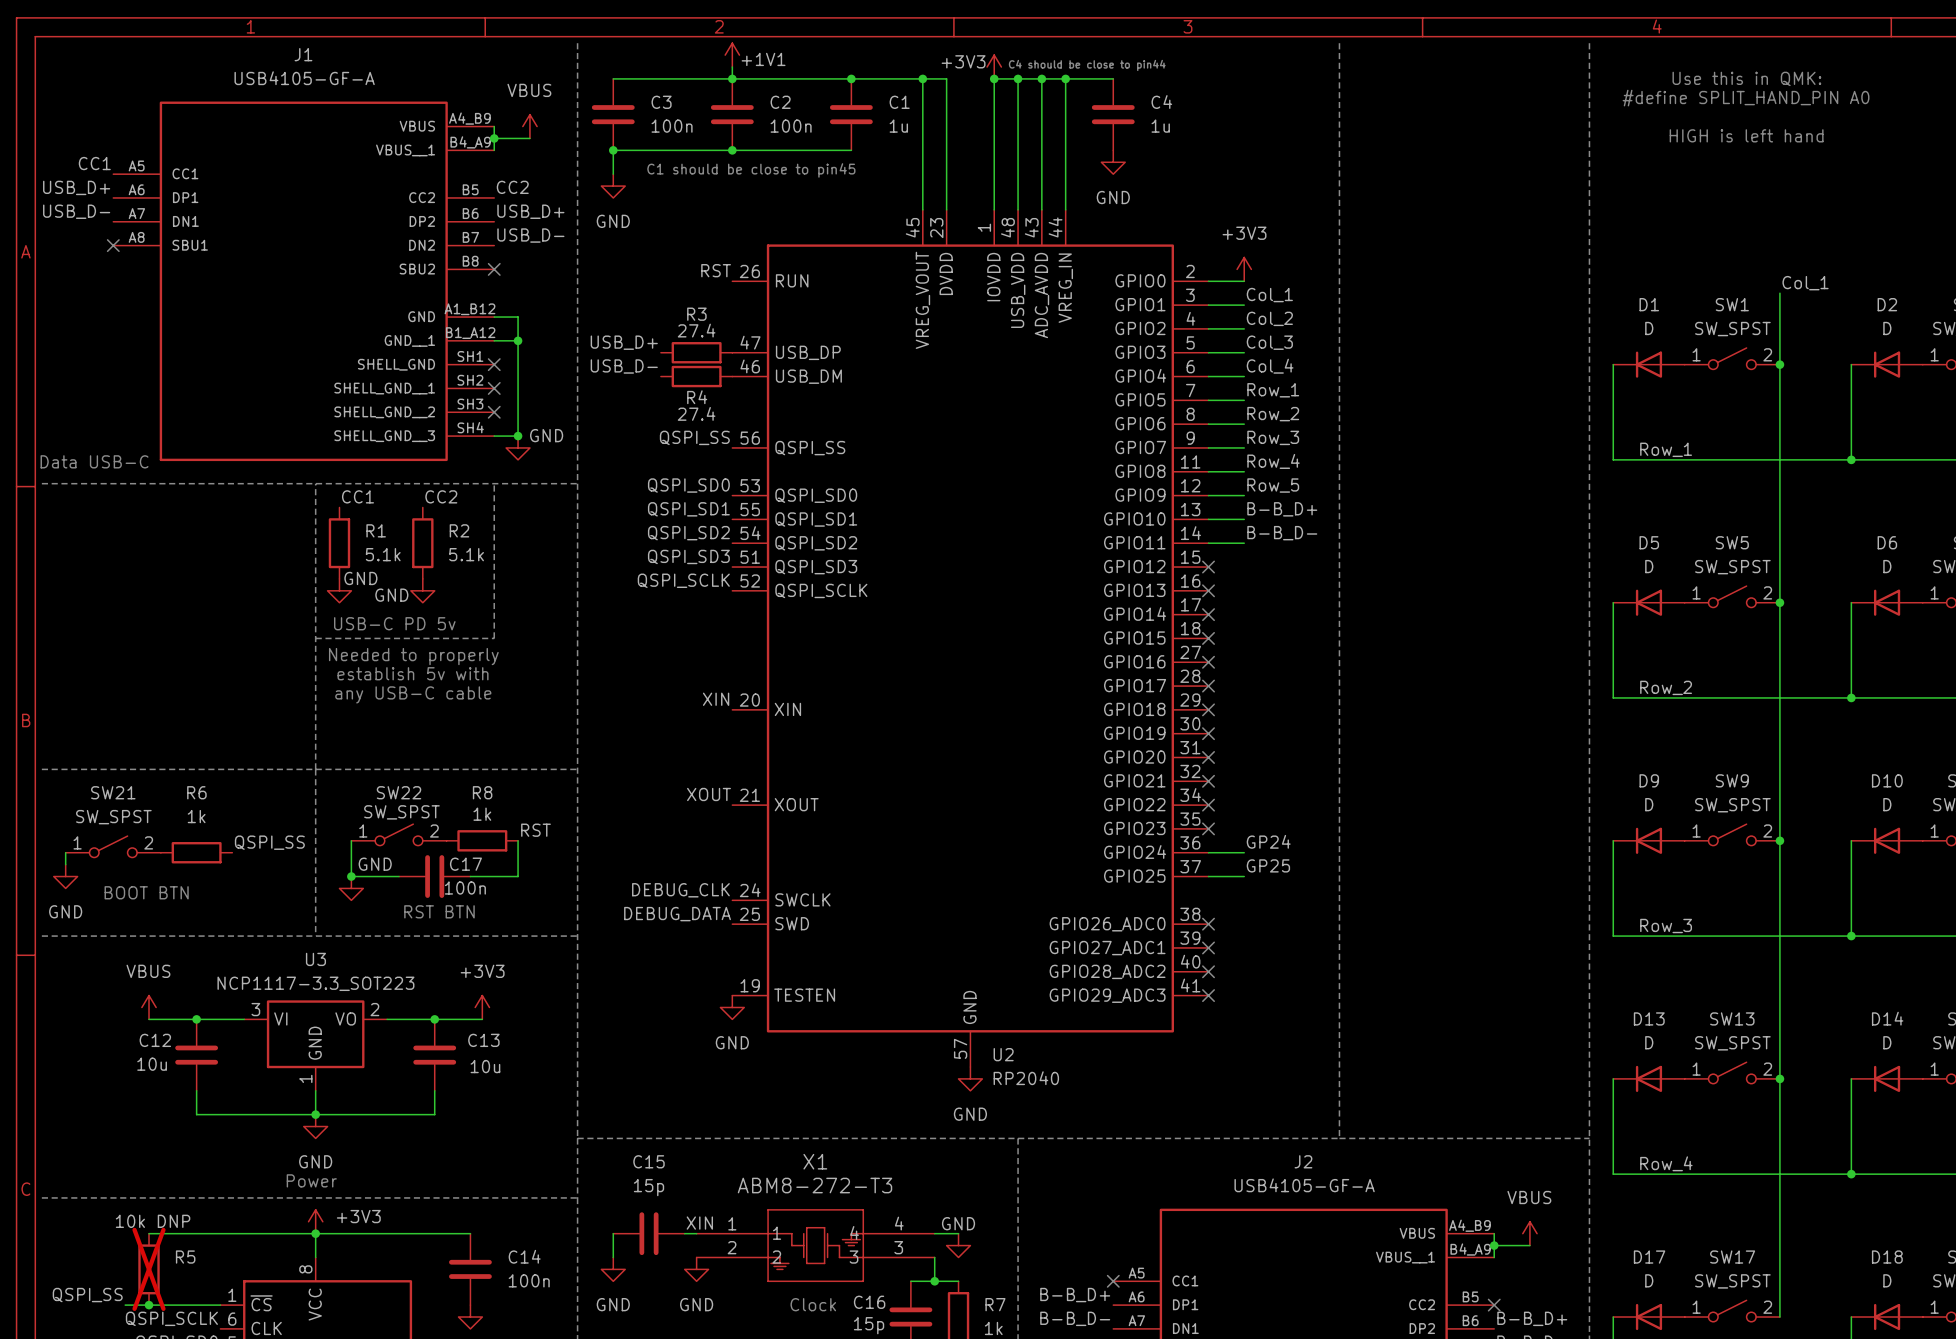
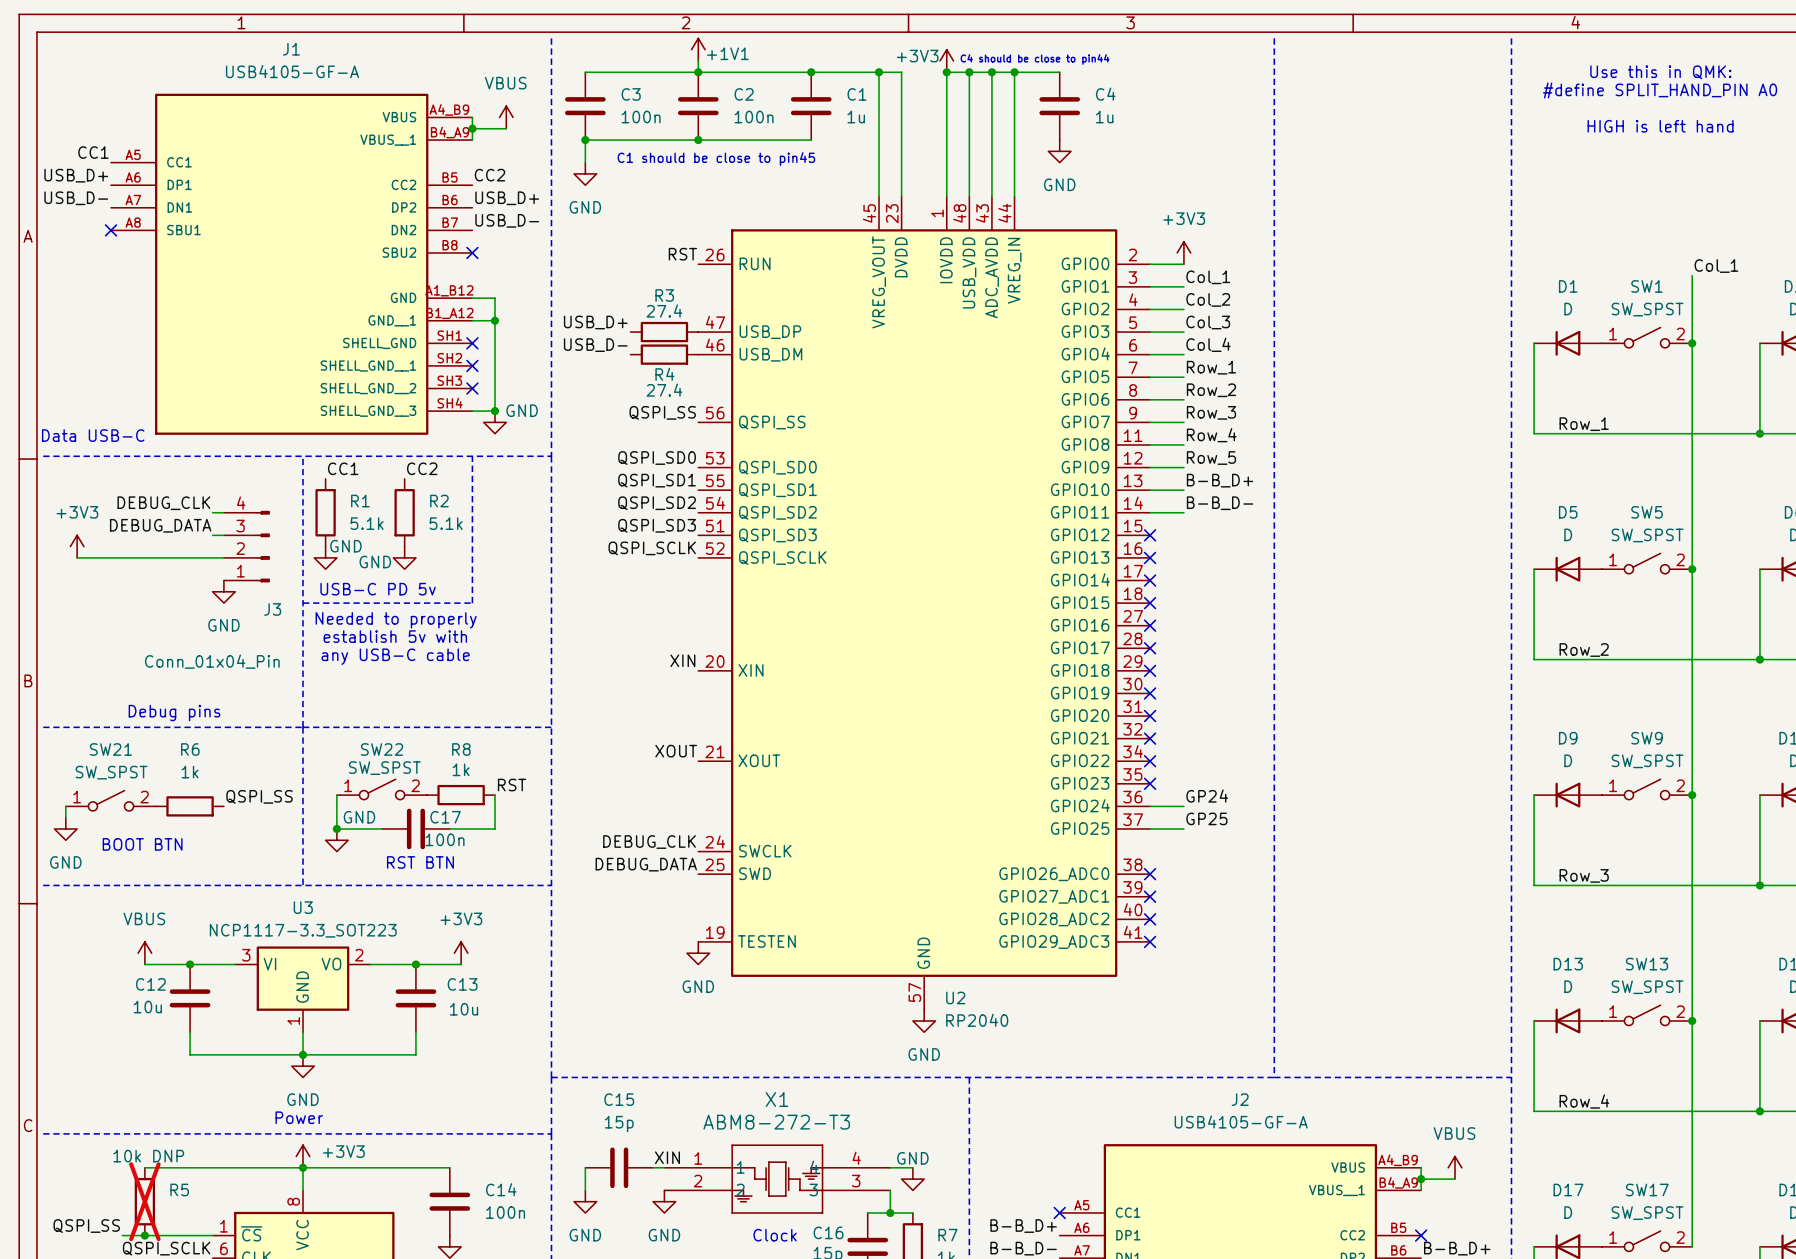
label: none -> DEBUG_CLK (163, 503)
wire: none -> (212, 512) (223, 512)
label: none -> DEBUG_DATA (160, 525)
wire: none -> (212, 535) (223, 535)
power symbol: none -> +3V3 (77, 546)
J3: none -> Conn_01x04_Pin (246, 546)
wire: none -> (77, 557) (223, 557)
power symbol: none -> GND (223, 591)
text: none -> Debug pins (174, 713)

